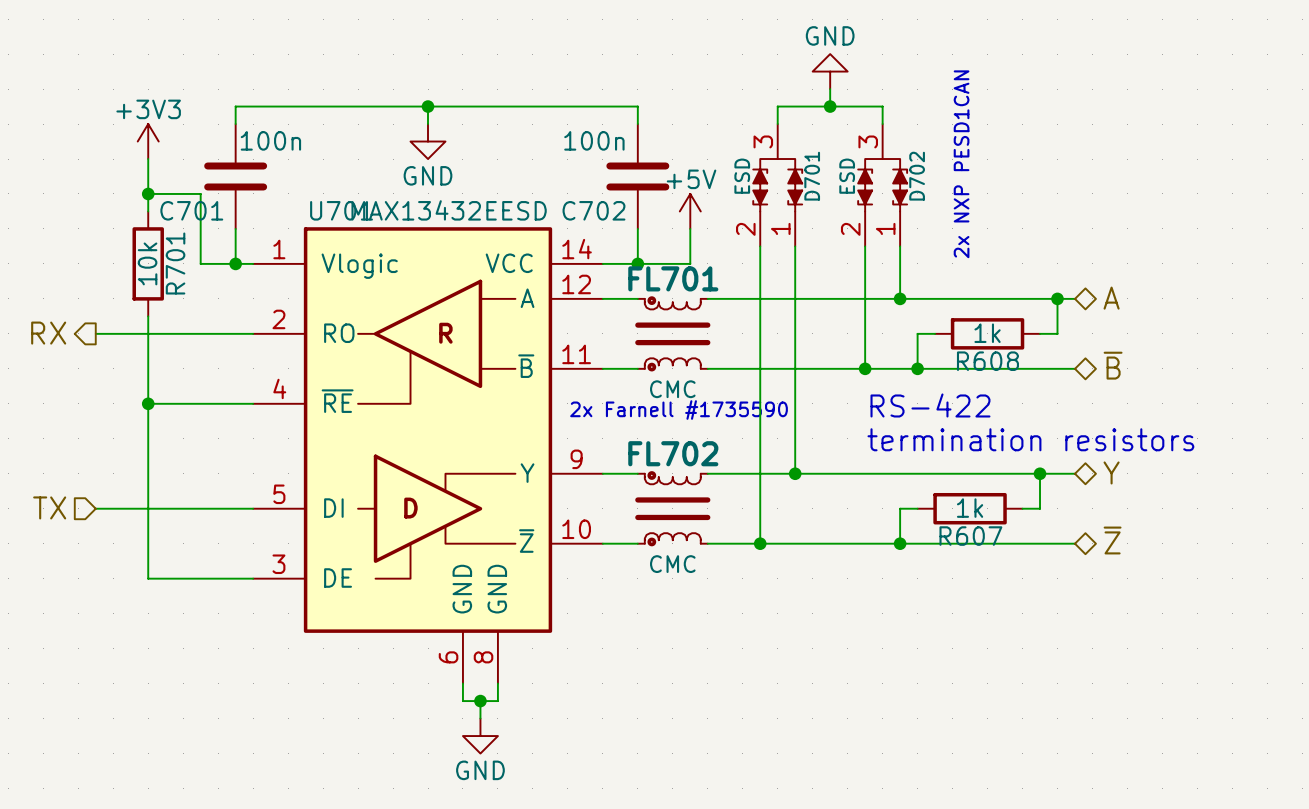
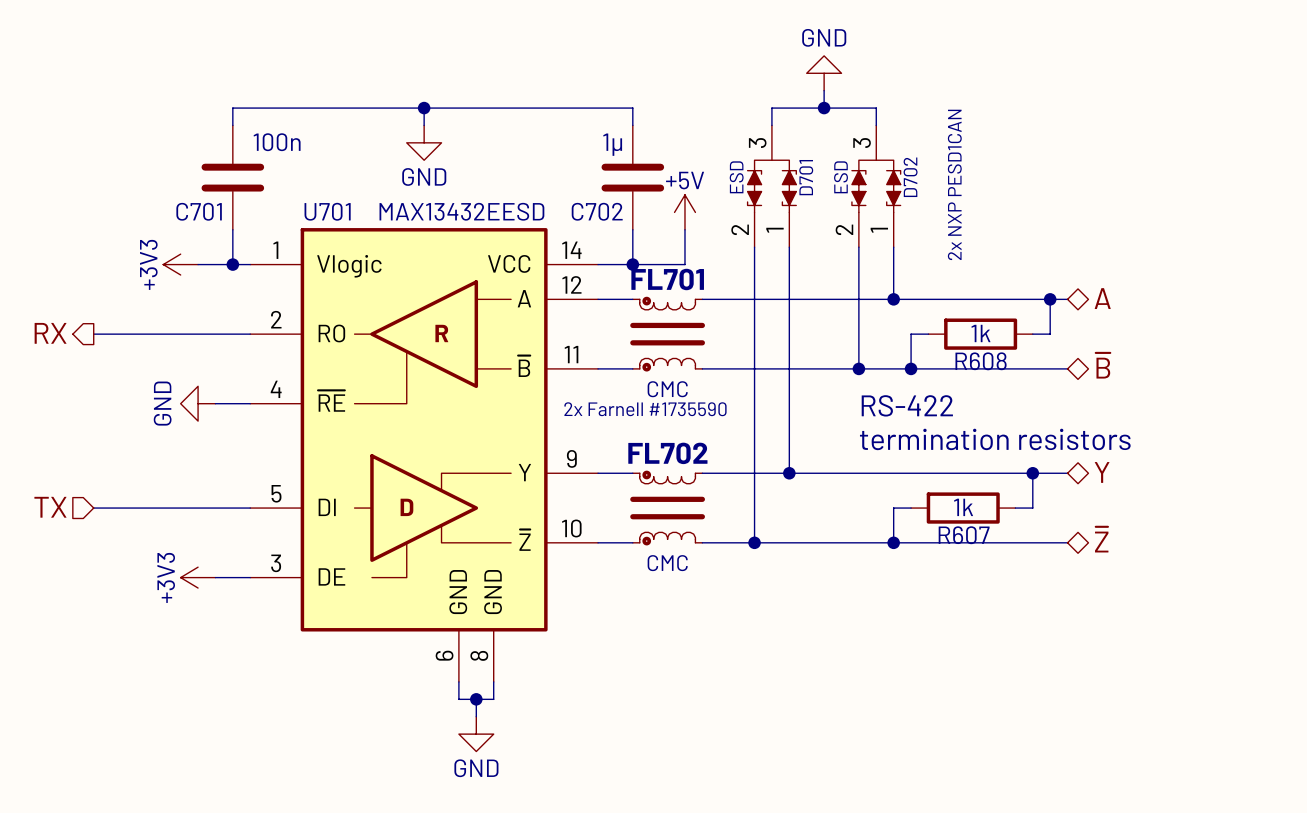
C702 value: 100n (594, 140) -> 1µ (612, 144)
power symbol rotation: 0° (148, 141) -> 90° counterclockwise (180, 264)
power symbol position: +3V3 (148, 141) -> +3V3 (180, 264)
wire: (148, 159) (148, 211) -> none
wire: (148, 193) (200, 193) (200, 263) -> none
junction: (148, 193) -> none
R701: 10k (148, 263) -> none
wire: (148, 316) (148, 578) (218, 578) -> none
wire: (148, 403) (218, 403) -> none
junction: (148, 403) -> none
power symbol: none -> GND (198, 403)
power symbol: none -> +3V3 (198, 577)

